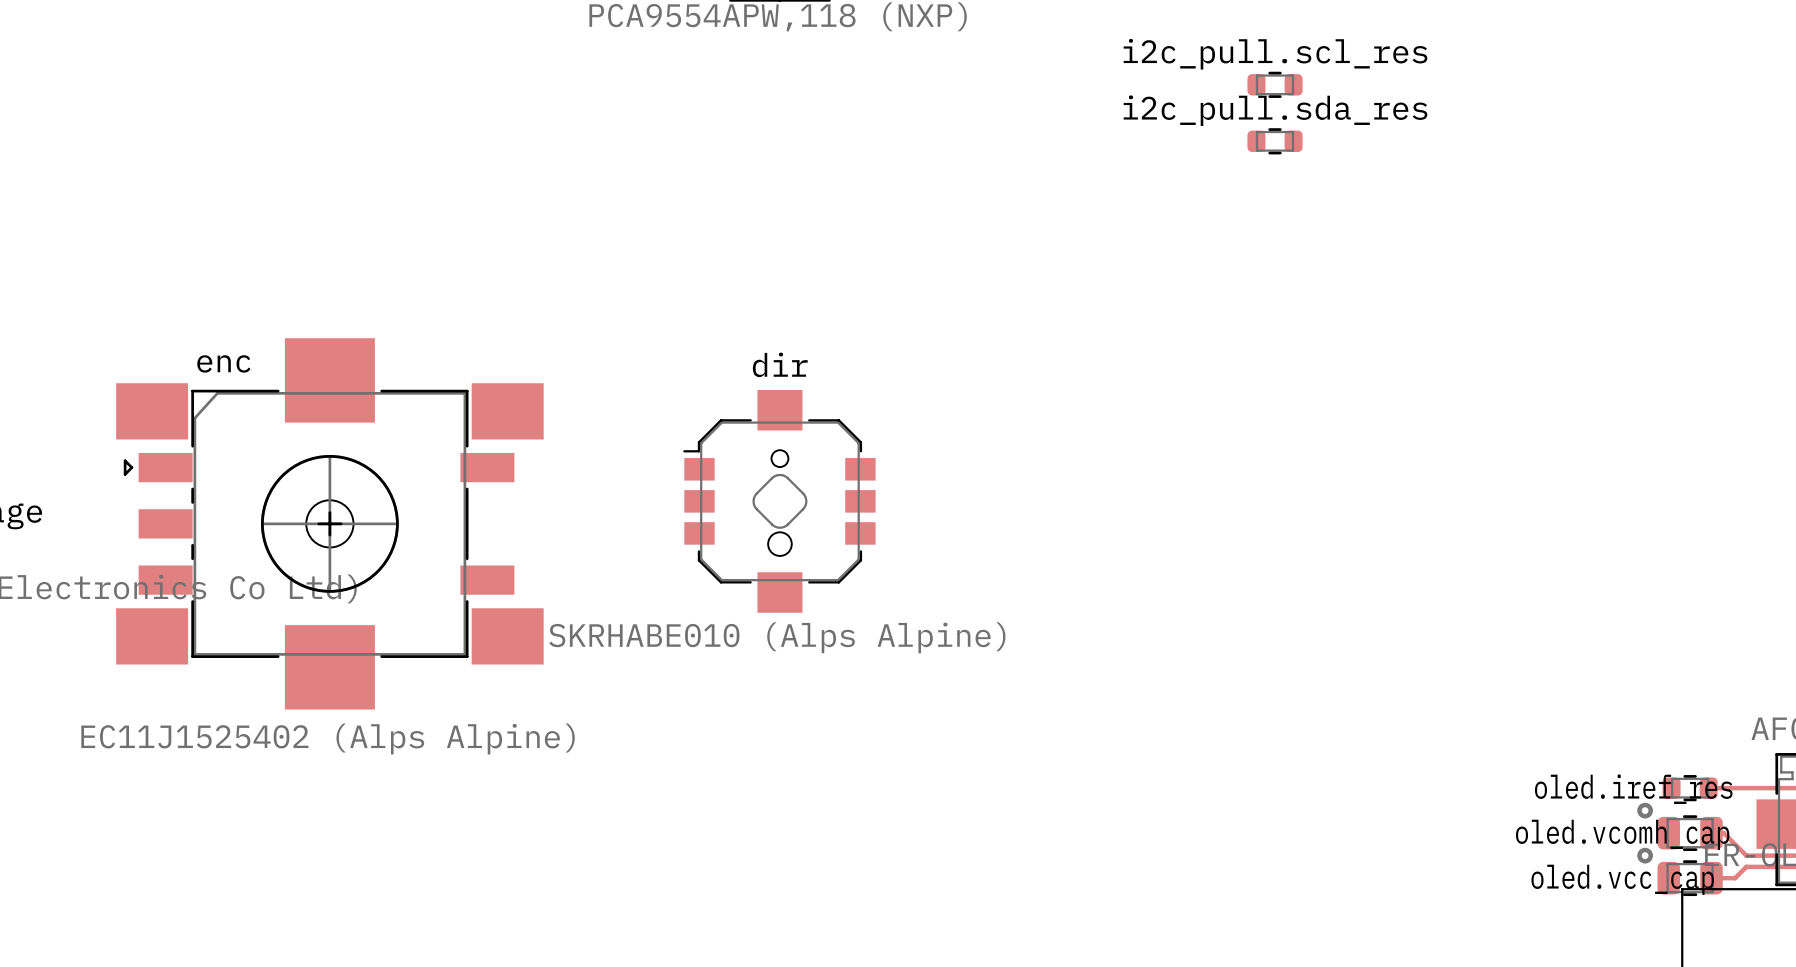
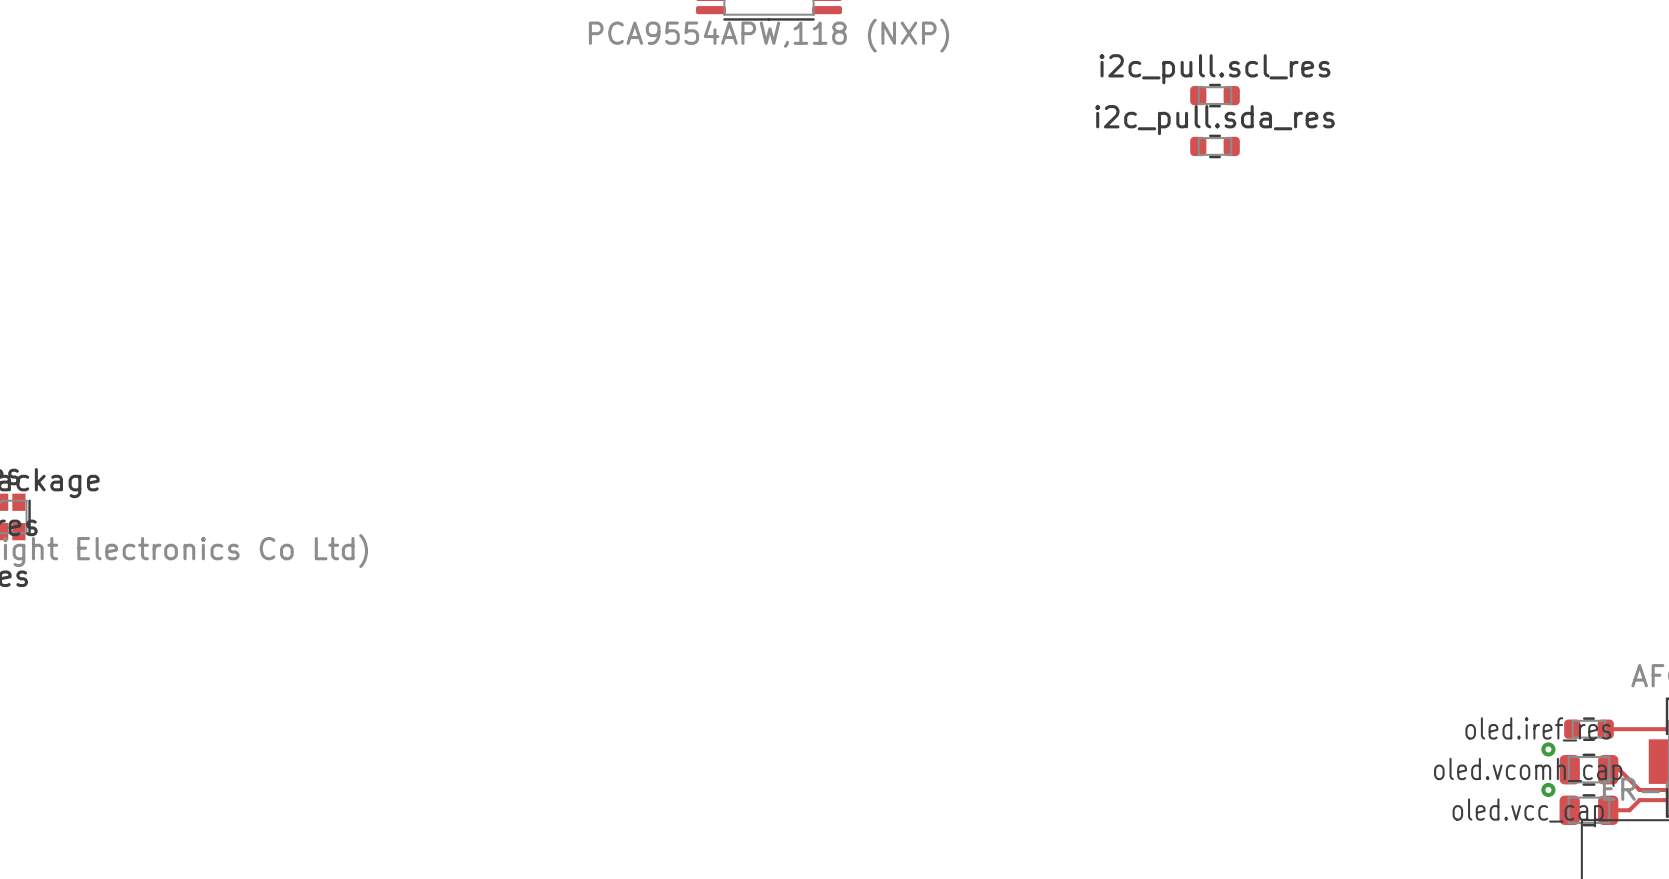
dir: SKRHABE010 (Alps Alpine) (779, 501) -> none
enc: EC11J1525402 (Alps Alpine) (329, 523) -> none

